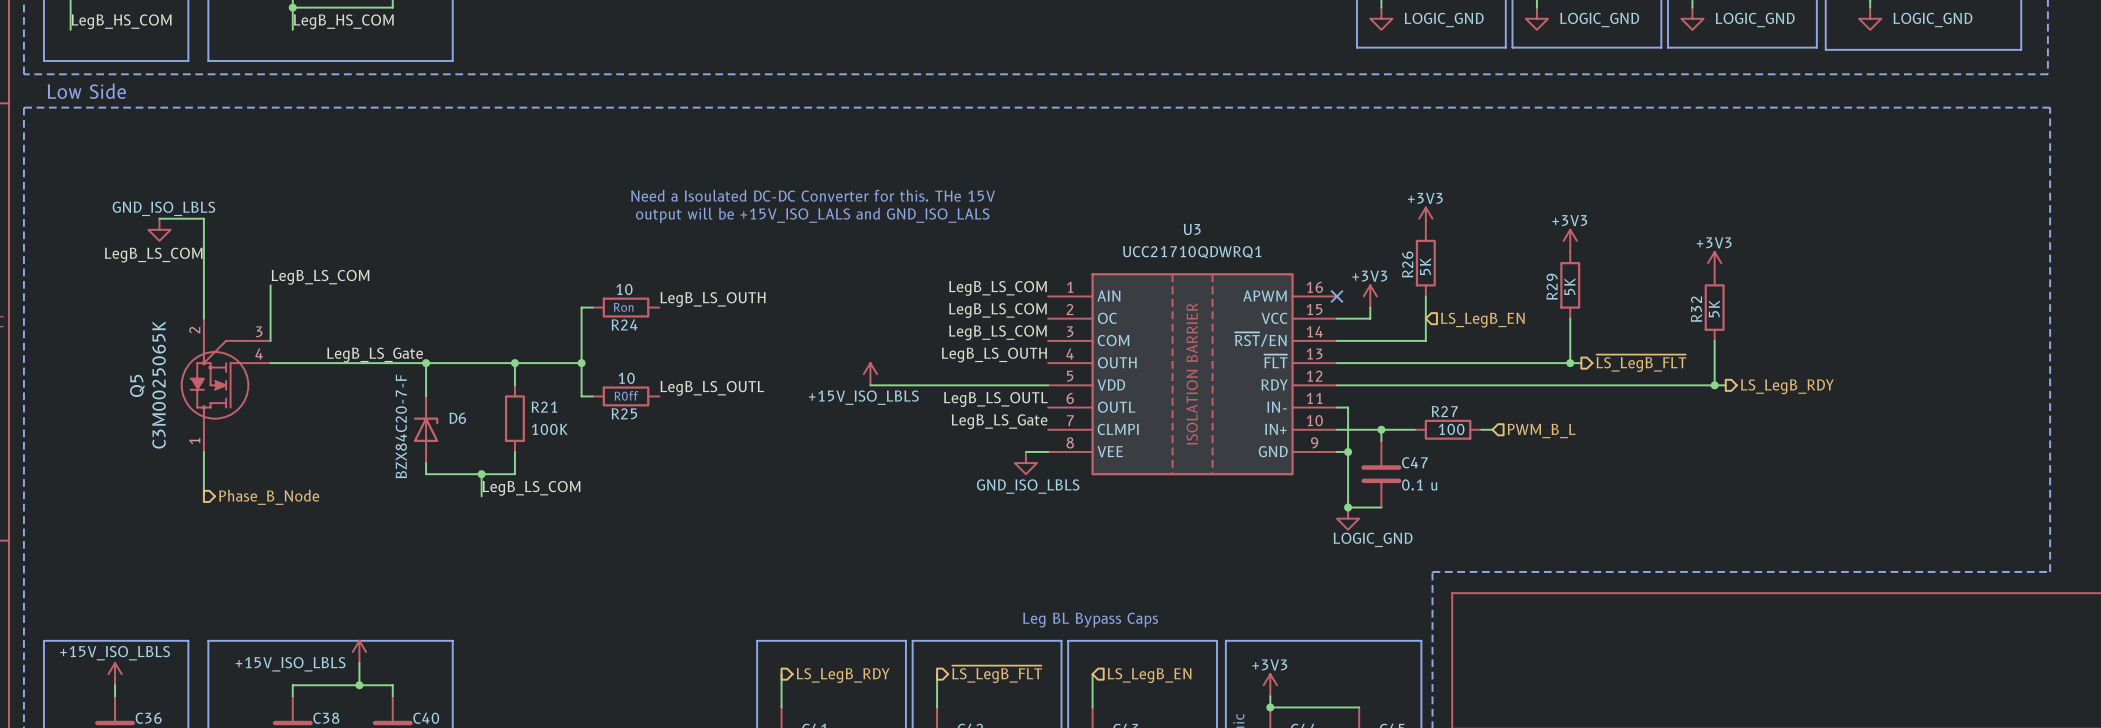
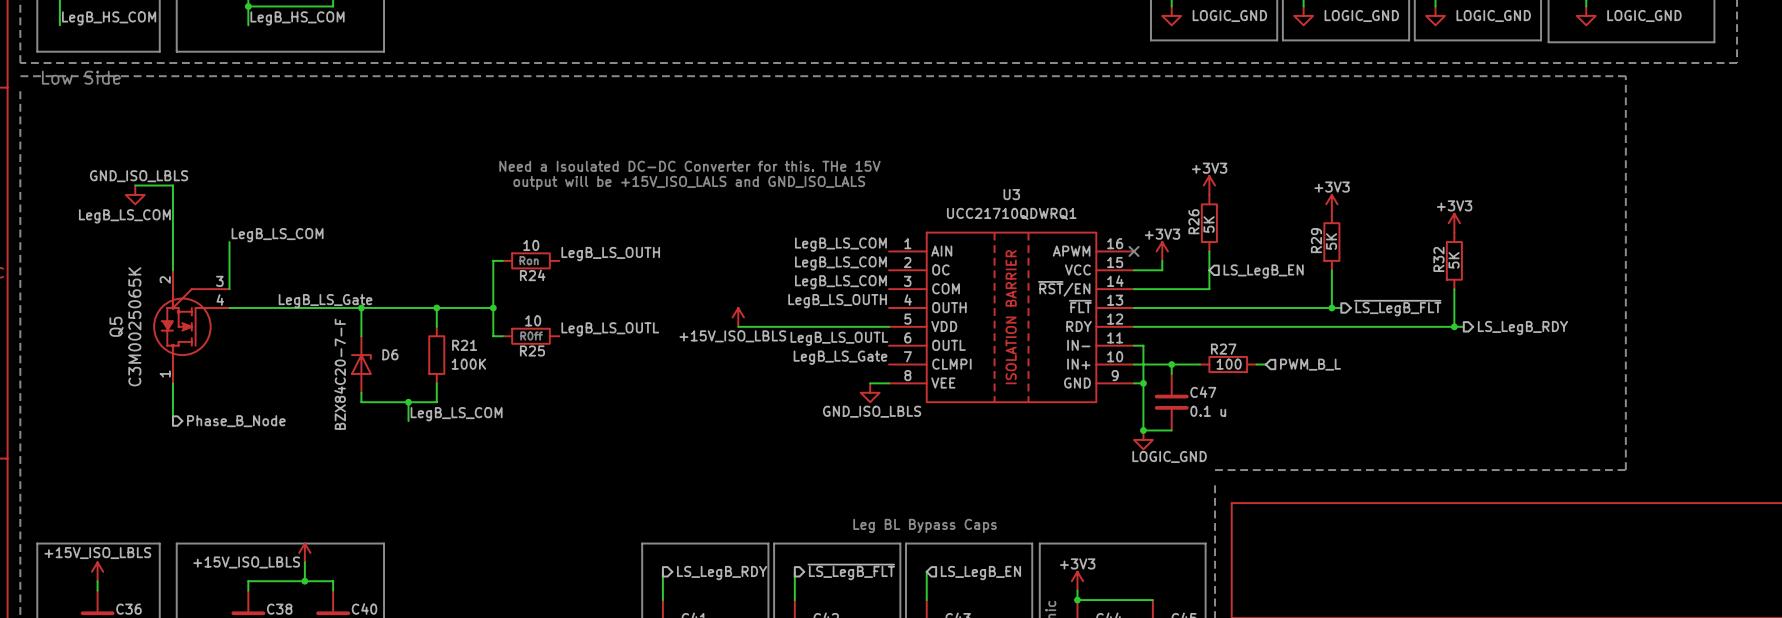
line: none -> (20, 76) (1625, 76) (1625, 470) (1215, 470)
line: (23, 107) (2050, 107) (2050, 571) (1432, 571) -> none

